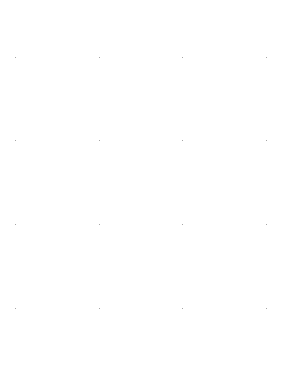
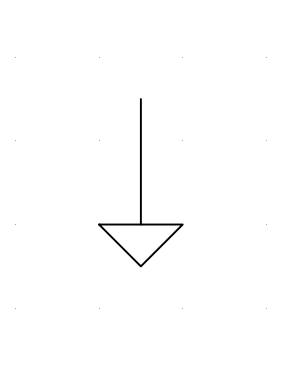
wire: none -> (140, 99) (140, 224)
power symbol: none -> (140, 245)

